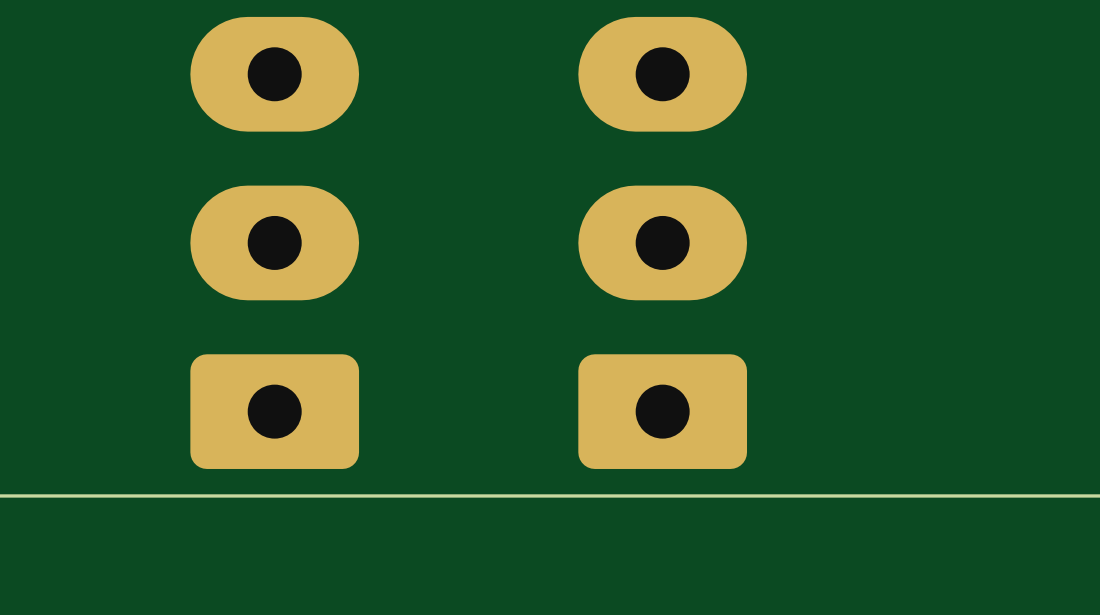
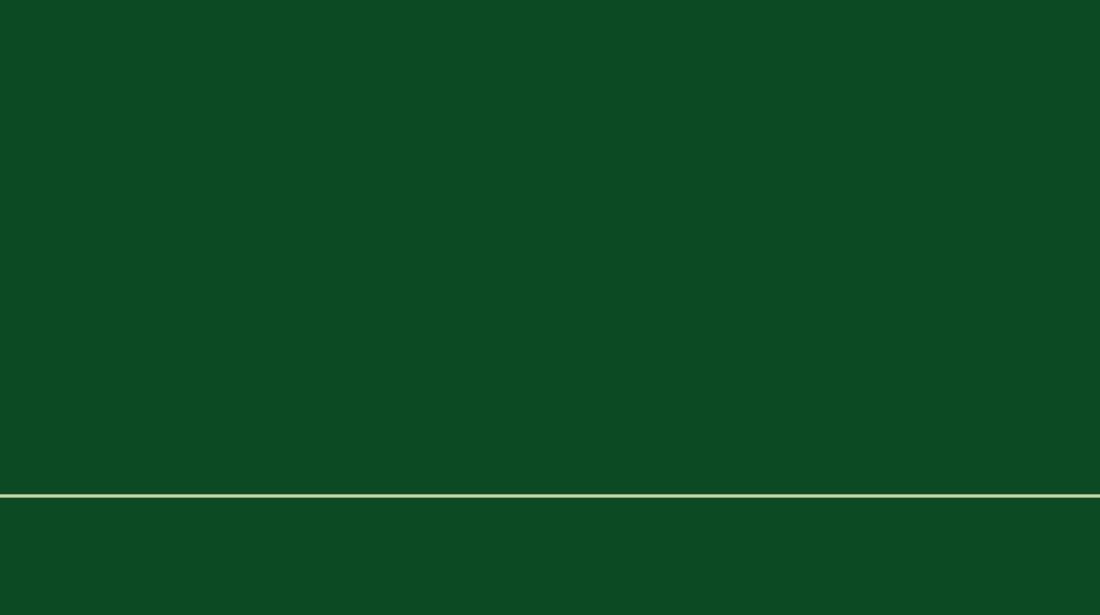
part: (274, 242) -> none
part: (662, 242) -> none

